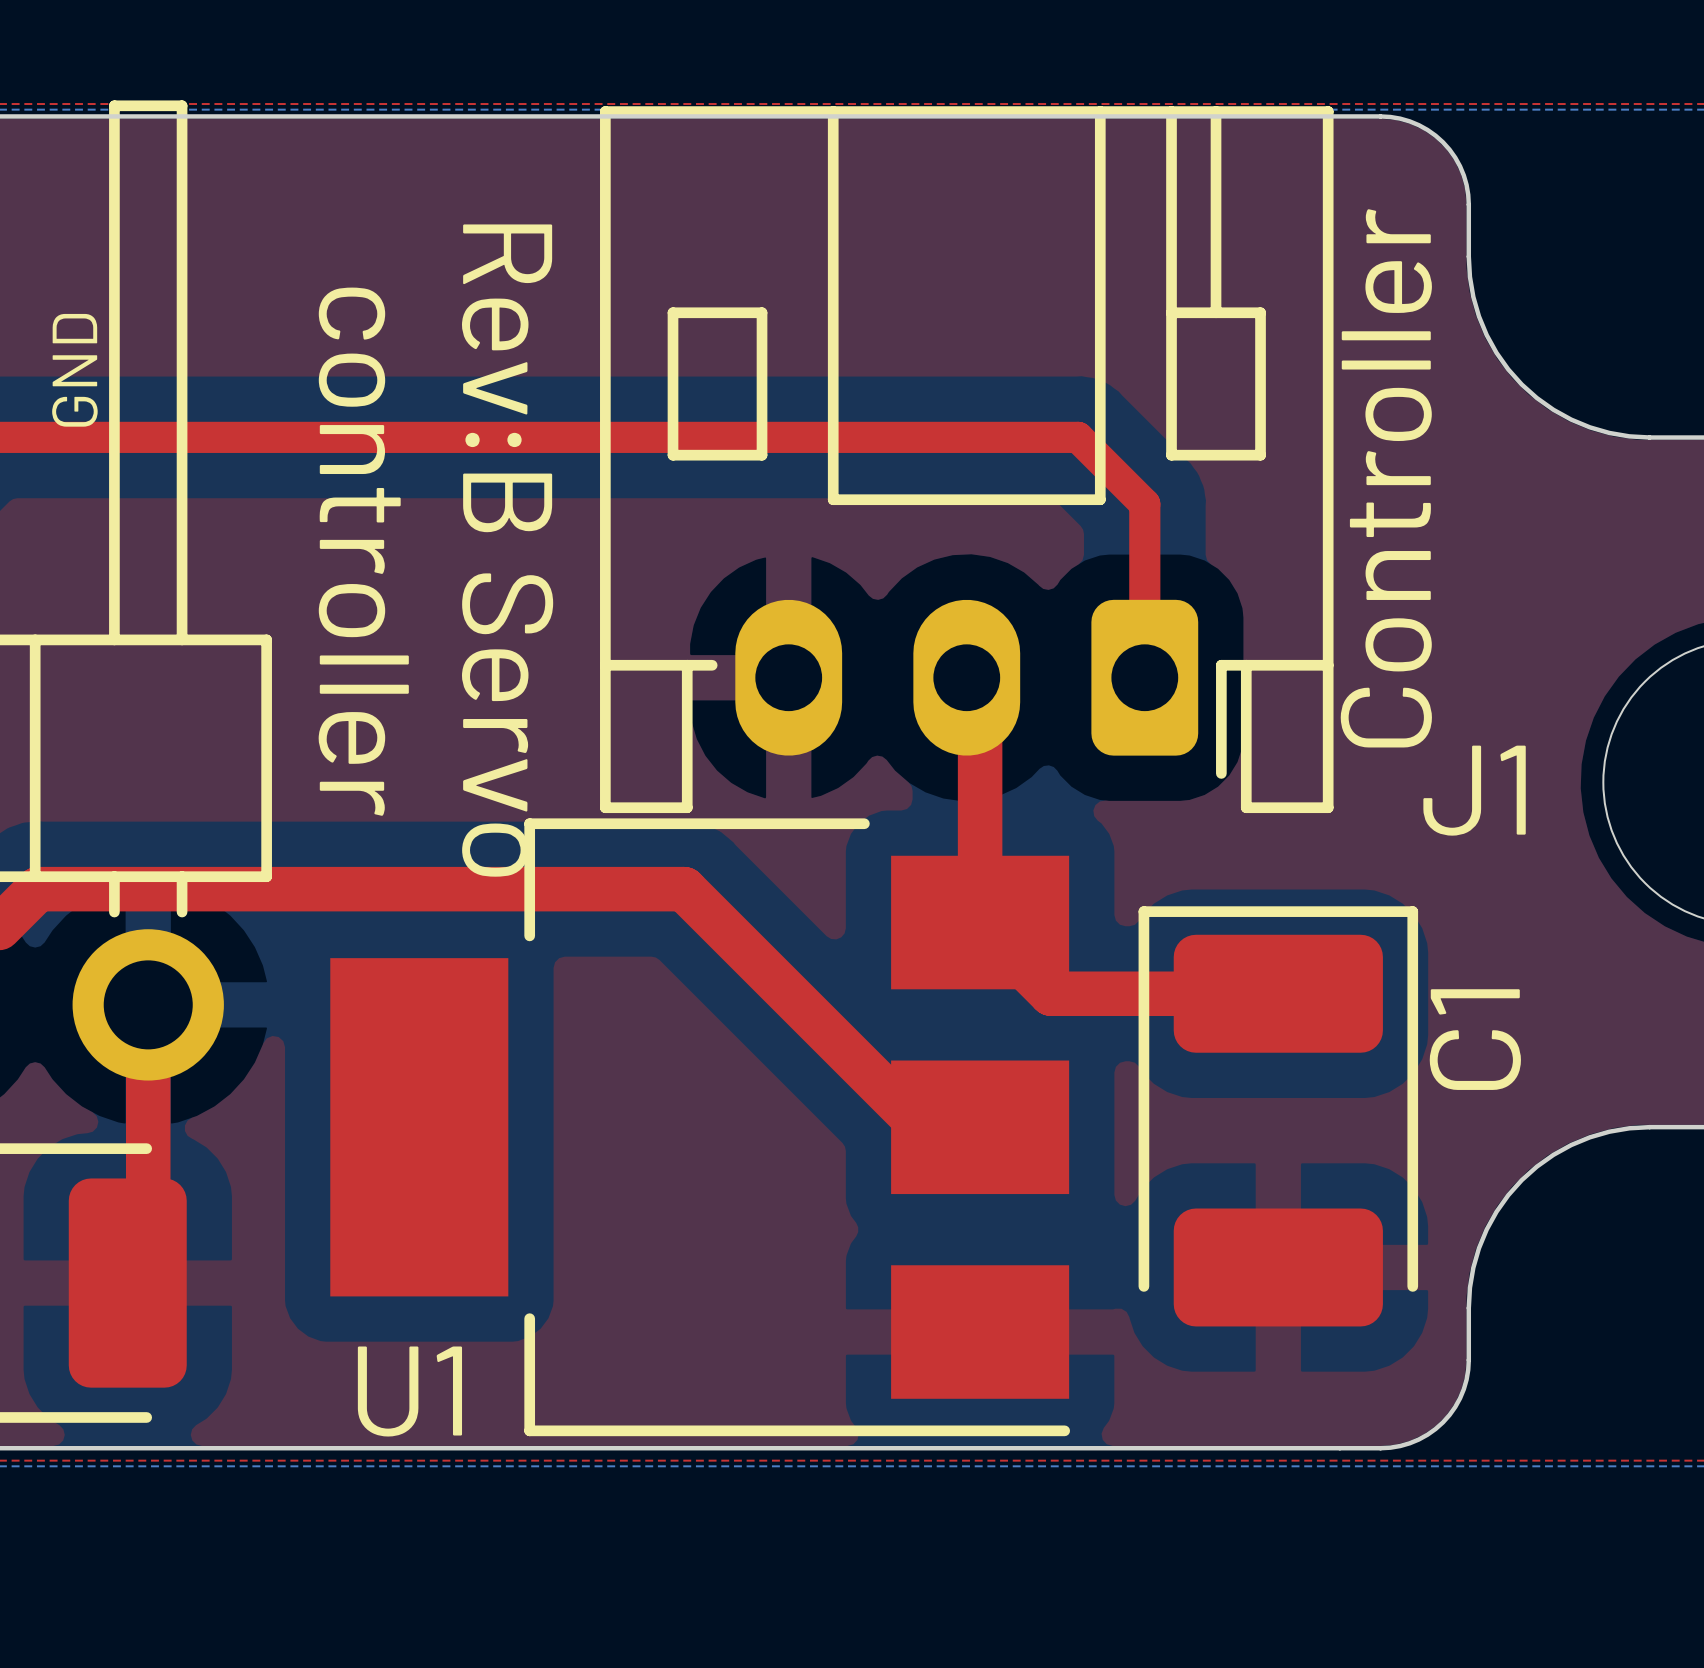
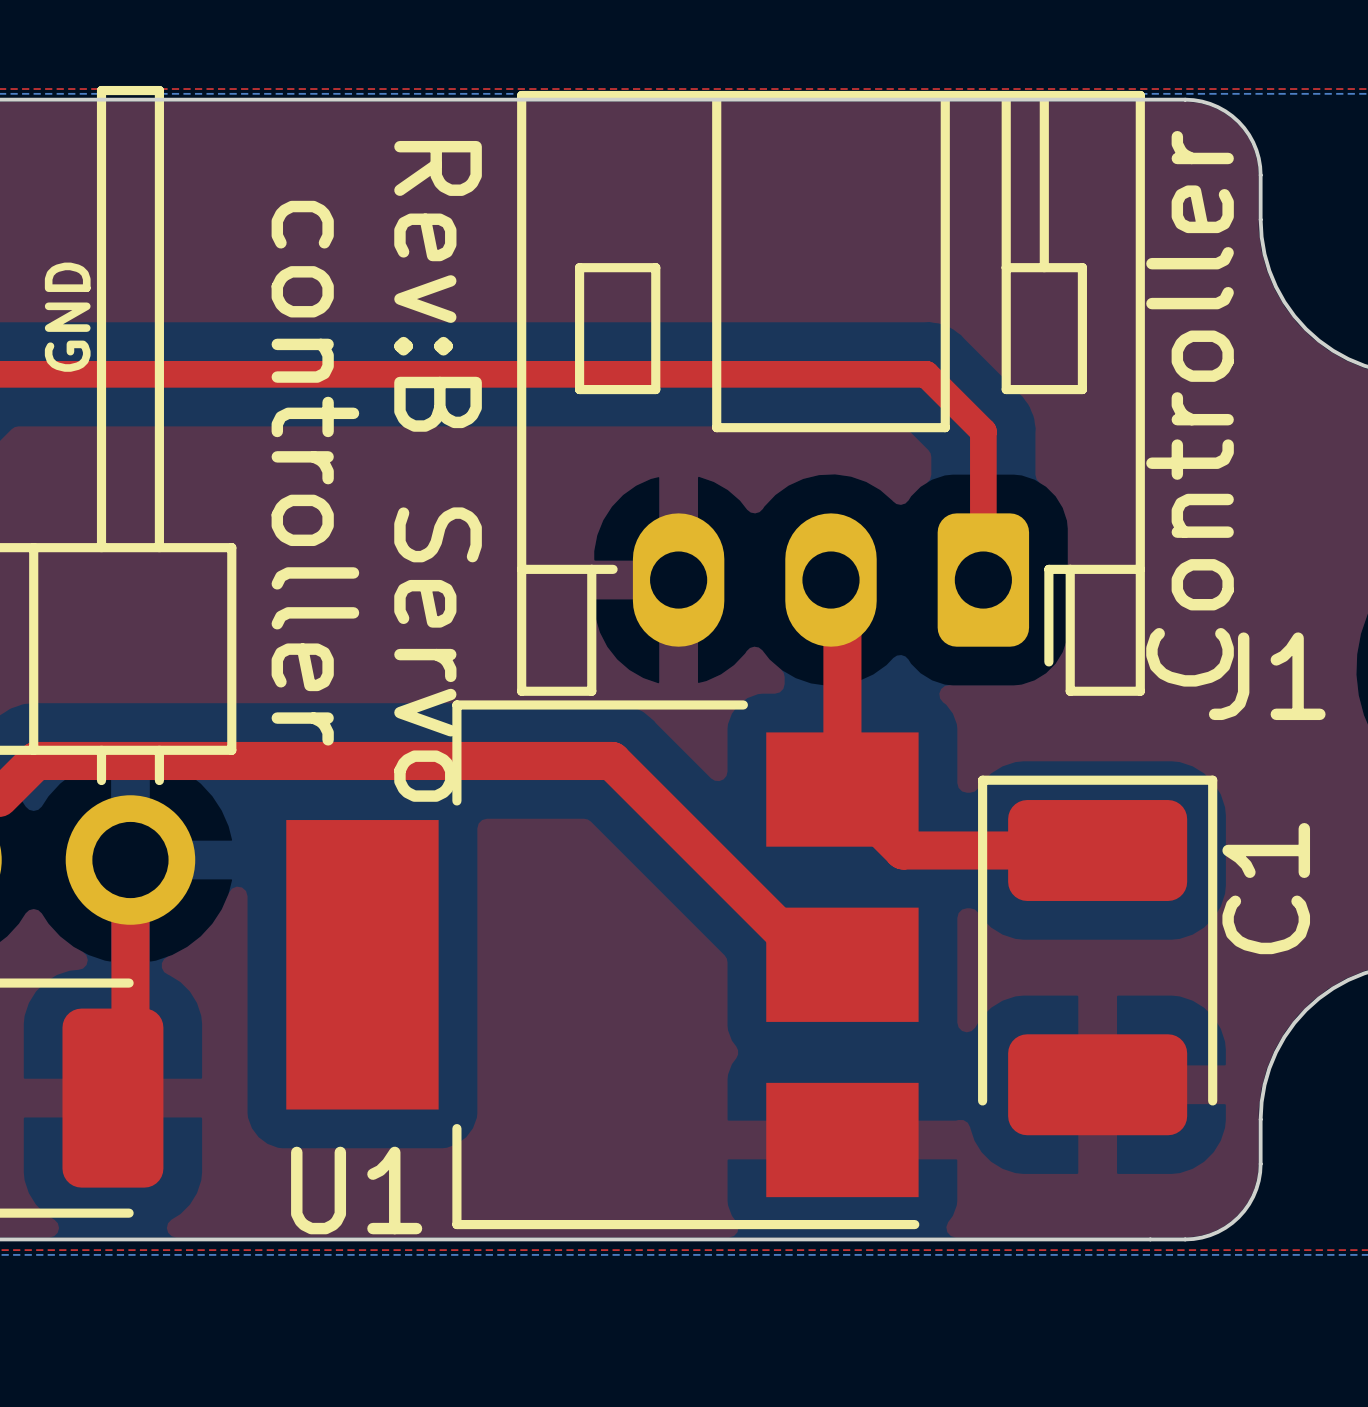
top track: (684, 889) (922, 1127) (948, 1127) -> (589, 760) (611, 760) (815, 964)

